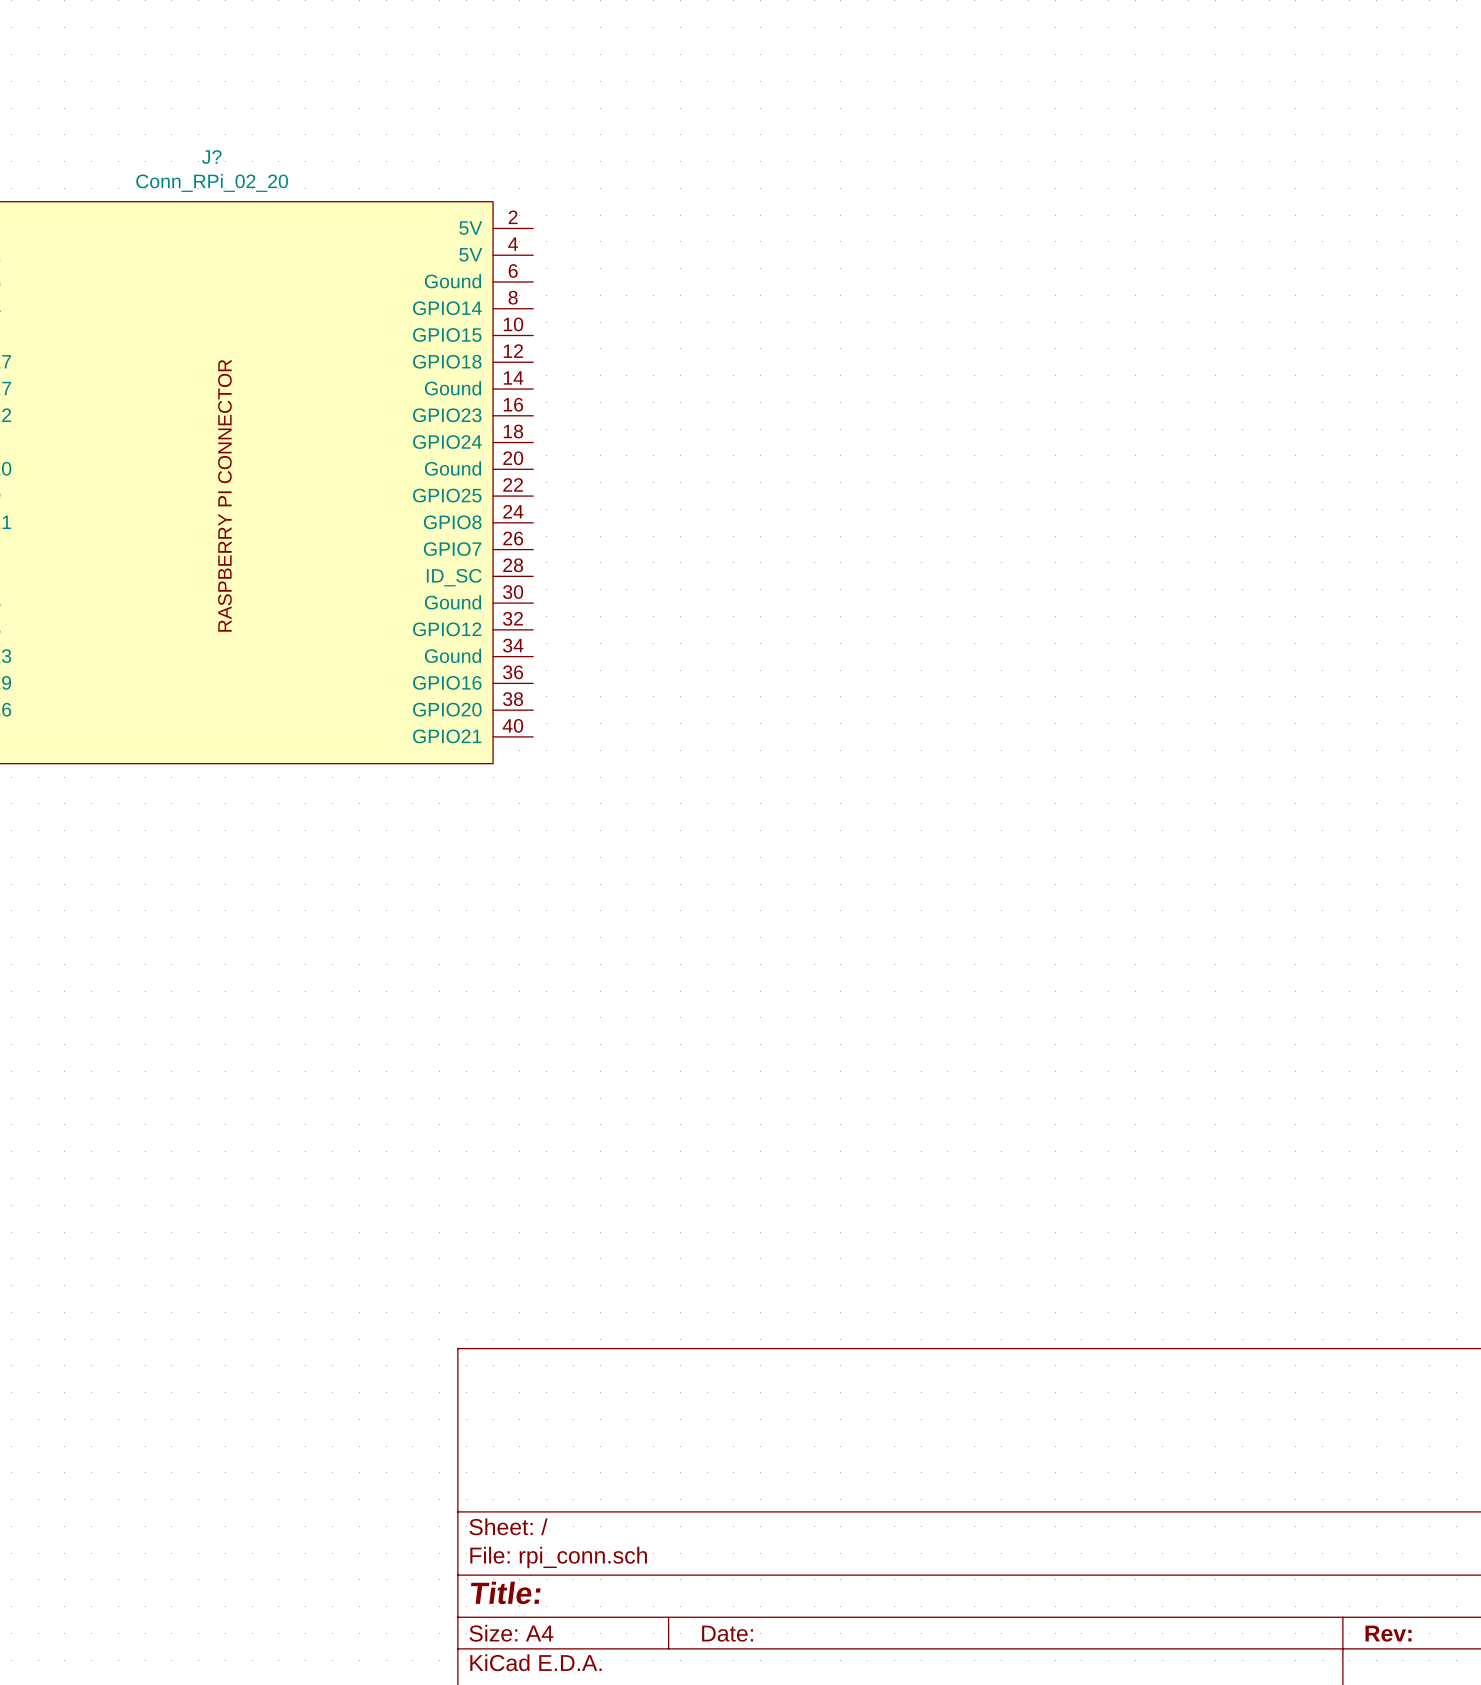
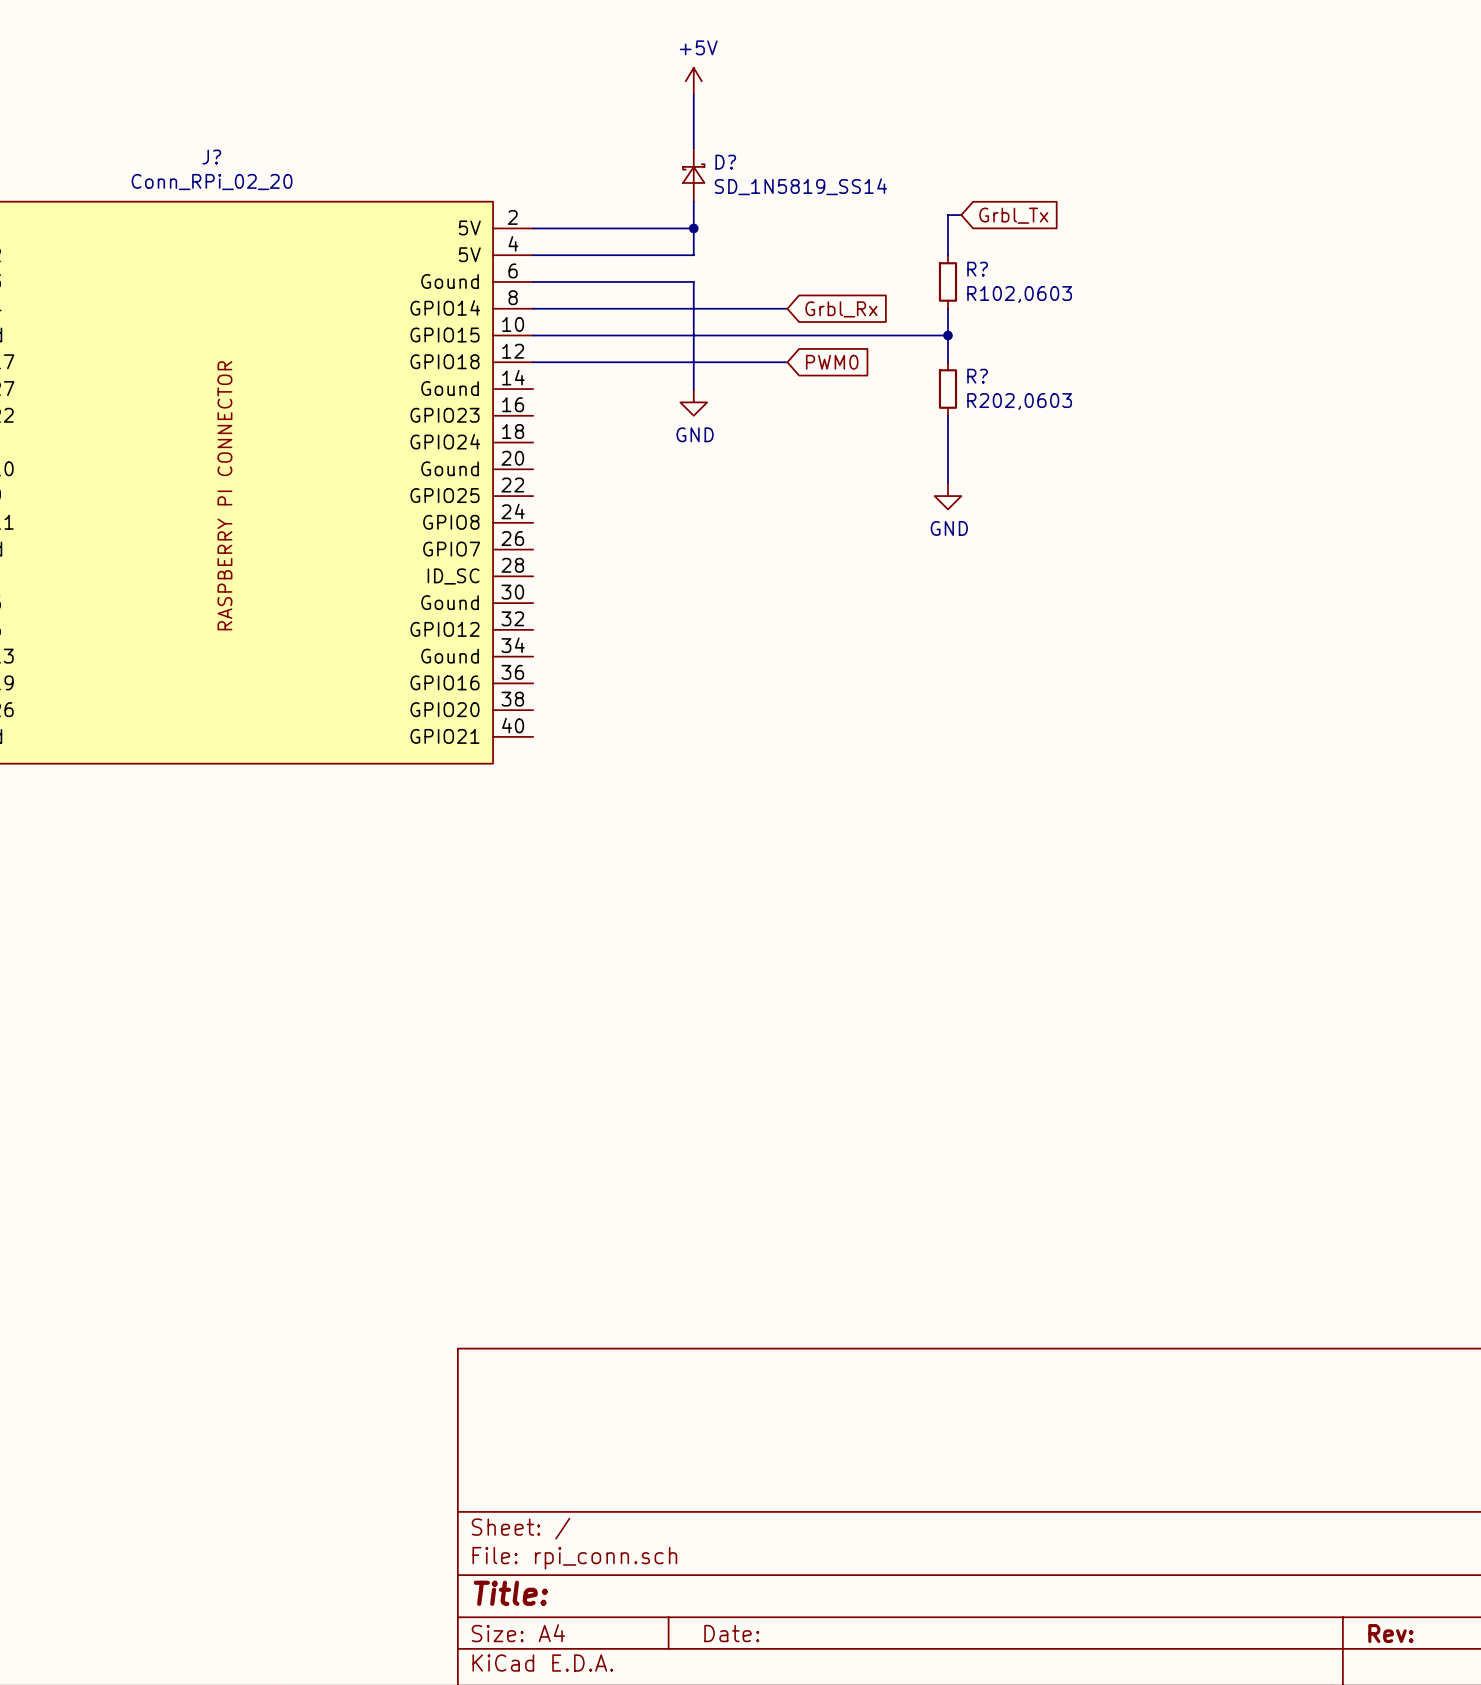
power symbol: none -> +5V (693, 81)
wire: none -> (693, 94) (693, 148)
D?: none -> SD_1N5819_SS14 (693, 174)
wire: none -> (693, 201) (693, 255) (533, 255)
wire: none -> (961, 215) (947, 215) (947, 255)
global label: none -> Grbl_Tx (1013, 215)
wire: none -> (533, 228) (693, 228)
junction: none -> (693, 228)
wire: none -> (533, 281) (693, 281) (693, 389)
R?: none -> R102,0603 (947, 281)
wire: none -> (533, 308) (787, 308)
wire: none -> (947, 308) (947, 362)
global label: none -> Grbl_Rx (841, 309)
wire: none -> (533, 335) (947, 335)
junction: none -> (947, 335)
wire: none -> (533, 362) (787, 362)
global label: none -> PWM0 (832, 362)
R?: none -> R202,0603 (947, 389)
power symbol: none -> GND (693, 402)
wire: none -> (947, 415) (947, 482)
power symbol: none -> GND (947, 496)

